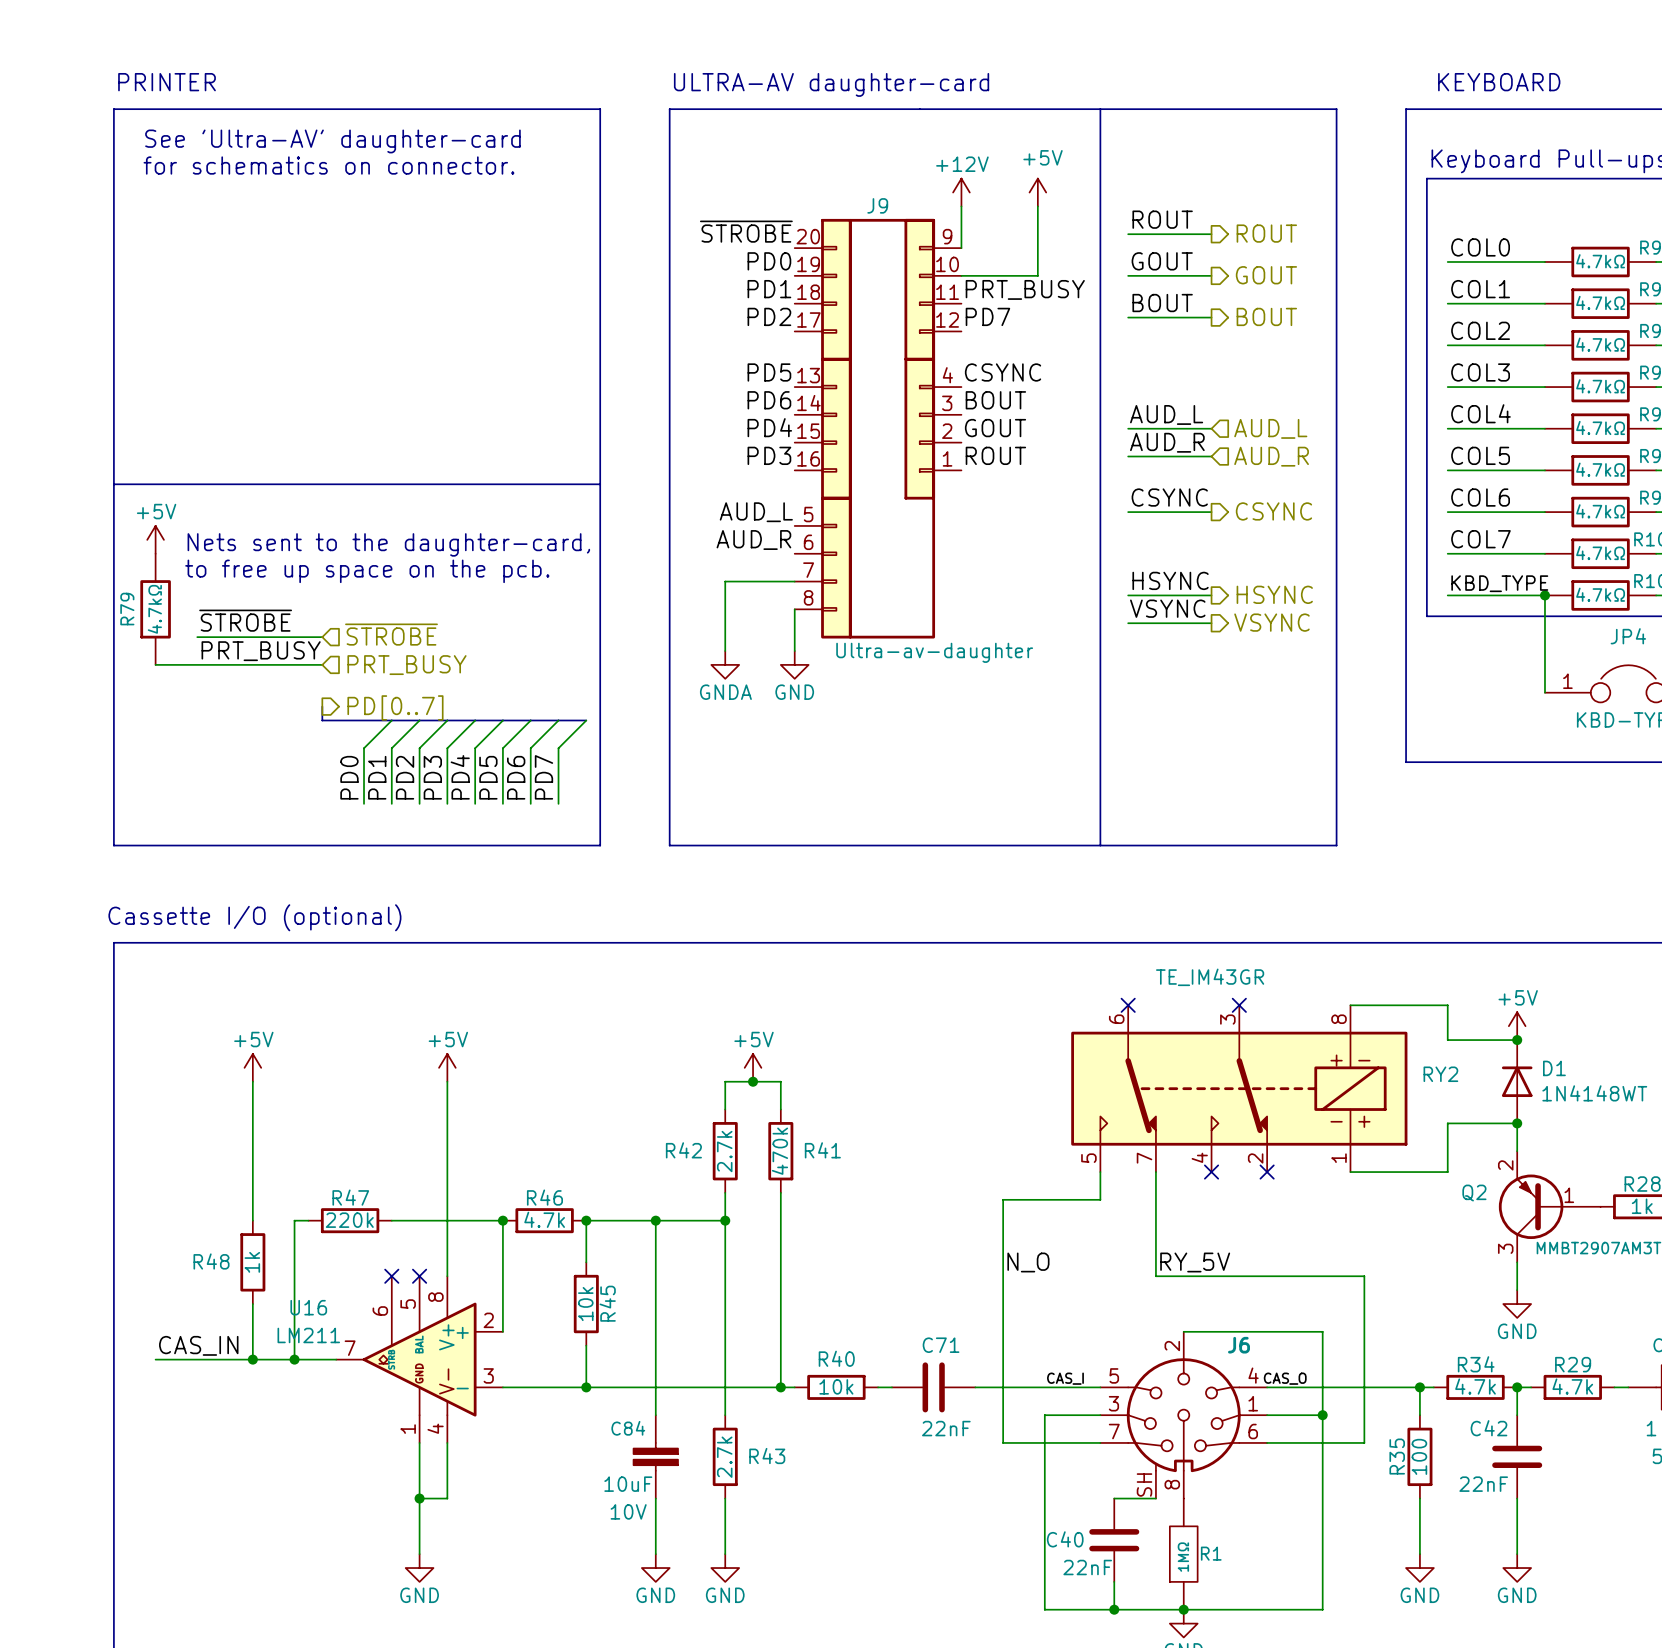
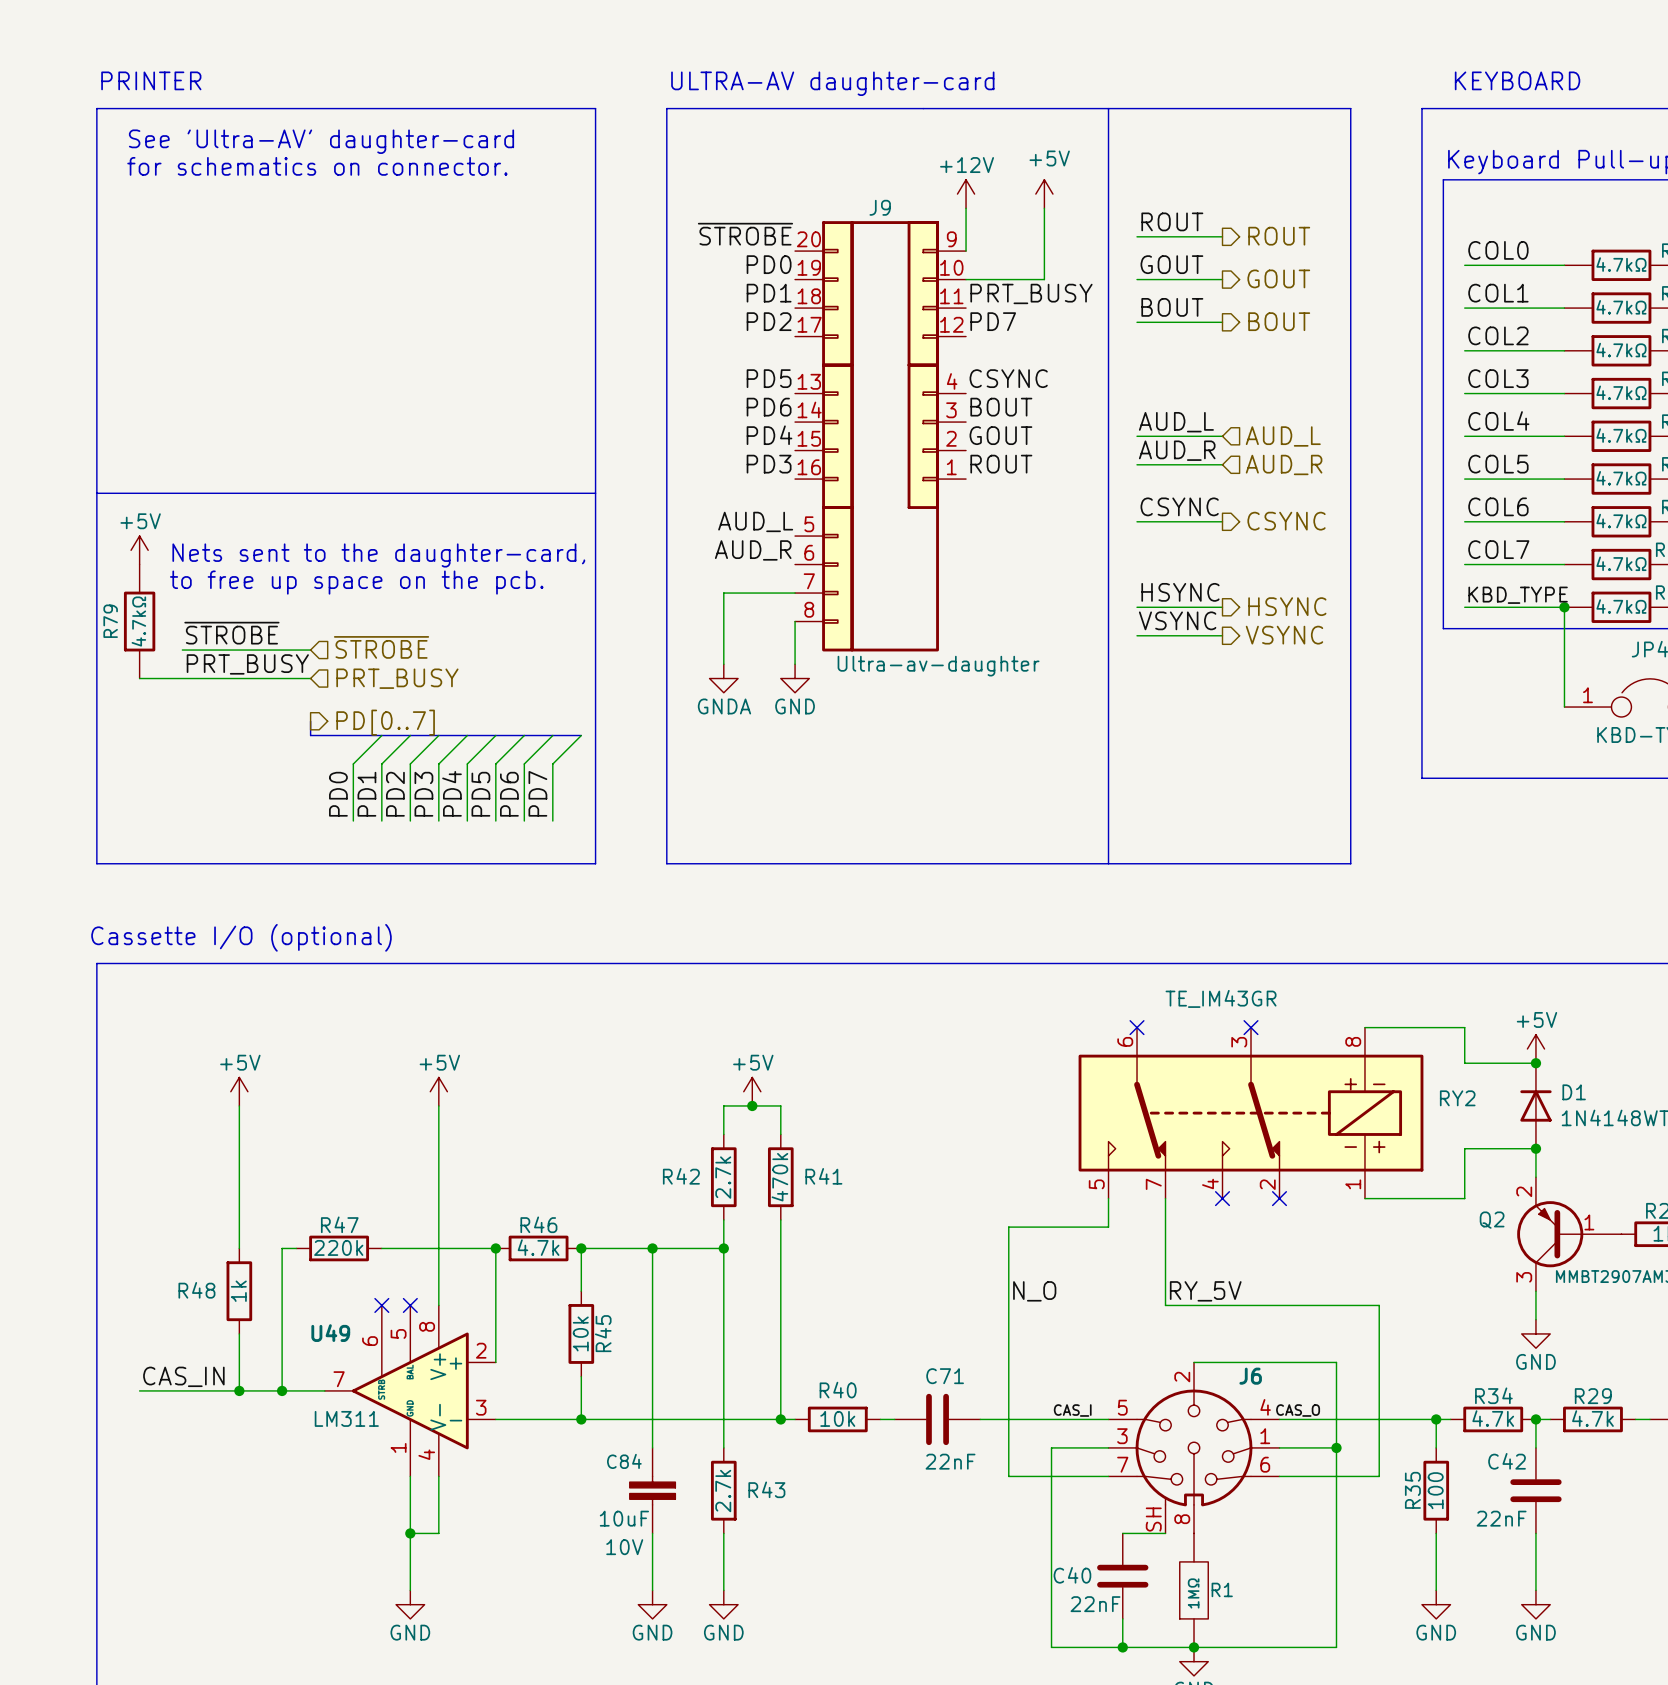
U16: LM211 (419, 1359) -> none
U49: none -> LM311 (410, 1390)

